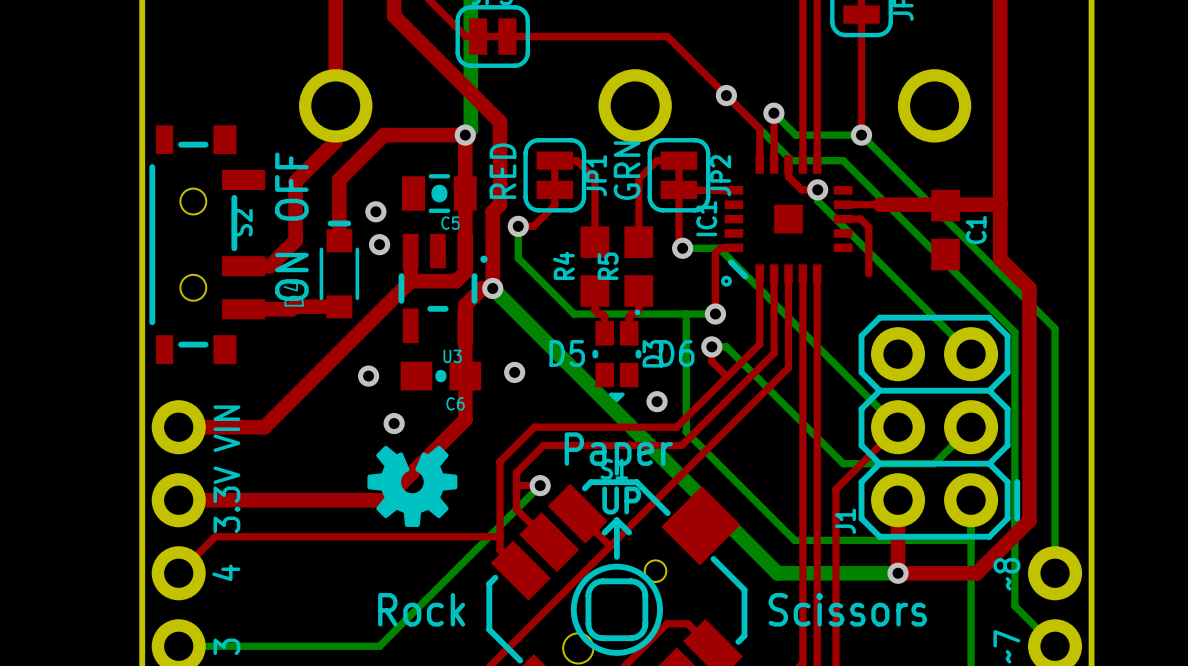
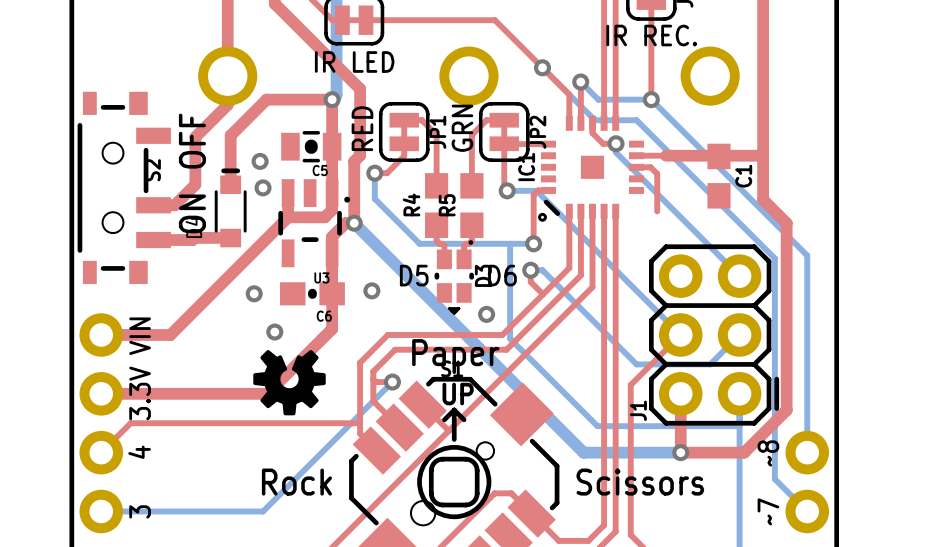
text: none -> IR REC. (651, 35)
text: none -> IR LED (354, 61)

